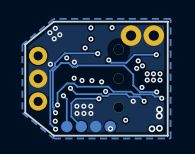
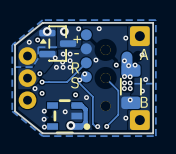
via: (55, 28) -> none
via: none -> (47, 31)
via: none -> (64, 31)
via: (49, 32) -> none
via: (59, 34) -> none
part: (142, 35) -> none
via: none -> (125, 38)
via: (54, 38) -> none
text: none -> + (77, 39)
via: none -> (37, 40)
via: (90, 39) -> none
via: none -> (29, 42)
part: none -> (57, 43)
zone outline: none -> (57, 47) (38, 47) (38, 58) (32, 67) (15, 67)
via: (85, 48) -> none
via: none -> (63, 54)
via: none -> (70, 54)
text: none -> - (76, 53)
track: (97, 53) (64, 53) (50, 70) (50, 123) (55, 129) -> none
via: (97, 53) -> none
track: (156, 54) (134, 54) (126, 62) (111, 62) (108, 60) -> none
part: none -> (86, 55)
track: none -> (126, 57) (126, 65)
via: none -> (70, 60)
track: none -> (86, 62) (67, 82) (42, 82)
via: (50, 64) -> none
via: none -> (116, 65)
via: none -> (135, 65)
track: (57, 66) (61, 63) (68, 63) (72, 66) (124, 65) (133, 74) (133, 85) (140, 92) (156, 92) -> none
track: (57, 67) (52, 71) (52, 106) (56, 112) -> none
via: none -> (56, 67)
via: none -> (63, 67)
via: none -> (70, 67)
text: none -> R (75, 67)
via: (136, 68) -> none
via: (147, 73) -> none
via: (153, 73) -> none
via: (160, 73) -> none
via: none -> (39, 73)
via: none -> (84, 73)
via: none -> (124, 76)
via: none -> (130, 76)
via: (74, 78) -> none
track: none -> (105, 78) (118, 90) (118, 114) (106, 126)
part: none -> (139, 78)
via: (82, 80) -> none
via: (147, 80) -> none
via: (153, 80) -> none
via: (101, 81) -> none
via: none -> (42, 82)
text: none -> S (74, 82)
track: none -> (78, 82) (92, 96) (92, 123) (95, 126)
via: none -> (124, 82)
via: none -> (130, 82)
zone outline: none -> (153, 83) (133, 83)
via: (141, 87) -> none
part: none -> (130, 86)
track: (70, 88) (76, 94) (100, 94) (102, 96) (126, 94) (128, 96) (139, 96) (144, 101) -> none
via: (70, 88) -> none
via: none -> (35, 88)
via: none -> (124, 88)
via: none -> (130, 88)
via: (105, 91) -> none
via: none -> (42, 93)
track: (63, 95) (66, 99) (66, 126) -> none
via: (63, 95) -> none
via: none -> (75, 94)
track: (98, 98) (75, 98) (71, 103) (71, 116) (81, 126) (84, 126) -> none
track: (161, 98) (152, 94) (113, 91) (108, 86) (77, 86) (74, 83) (66, 83) (57, 92) (57, 105) -> none
via: (161, 98) -> none
via: (133, 101) -> none
via: (57, 105) -> none
via: (76, 106) -> none
via: (83, 106) -> none
track: none -> (76, 105) (81, 105) (85, 109) (85, 122) (81, 126) (76, 126)
via: (90, 106) -> none
via: (159, 109) -> none
via: (83, 113) -> none
via: (90, 113) -> none
via: (159, 115) -> none
via: none -> (125, 118)
part footprint: [61, 120, 116, 133] -> [47, 99, 91, 135]
via: (125, 120) -> none
via: none -> (70, 125)
via: none -> (106, 126)
via: (151, 128) -> none
via: (159, 128) -> none

